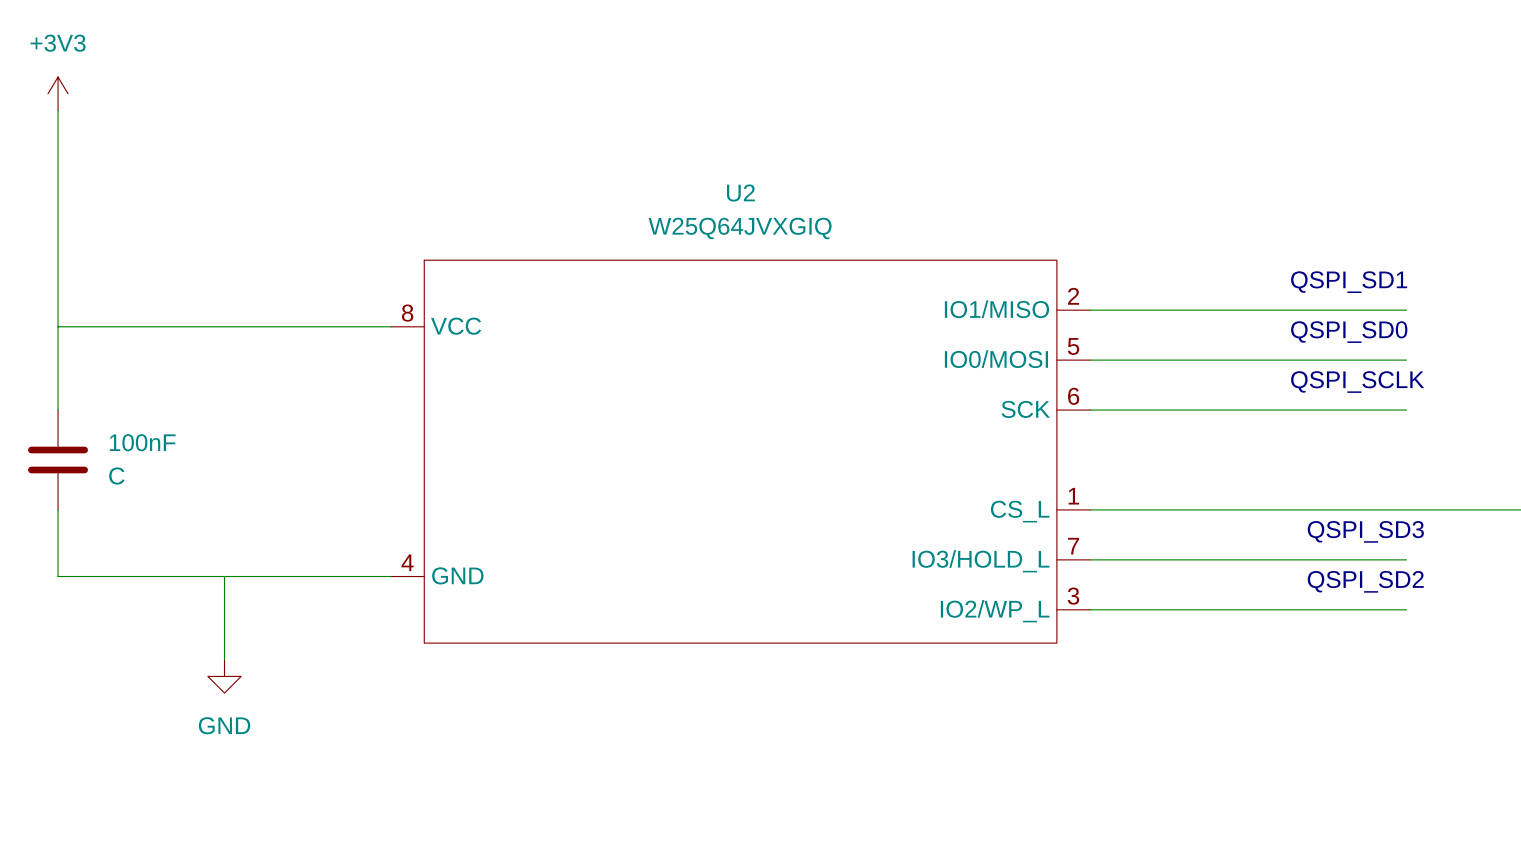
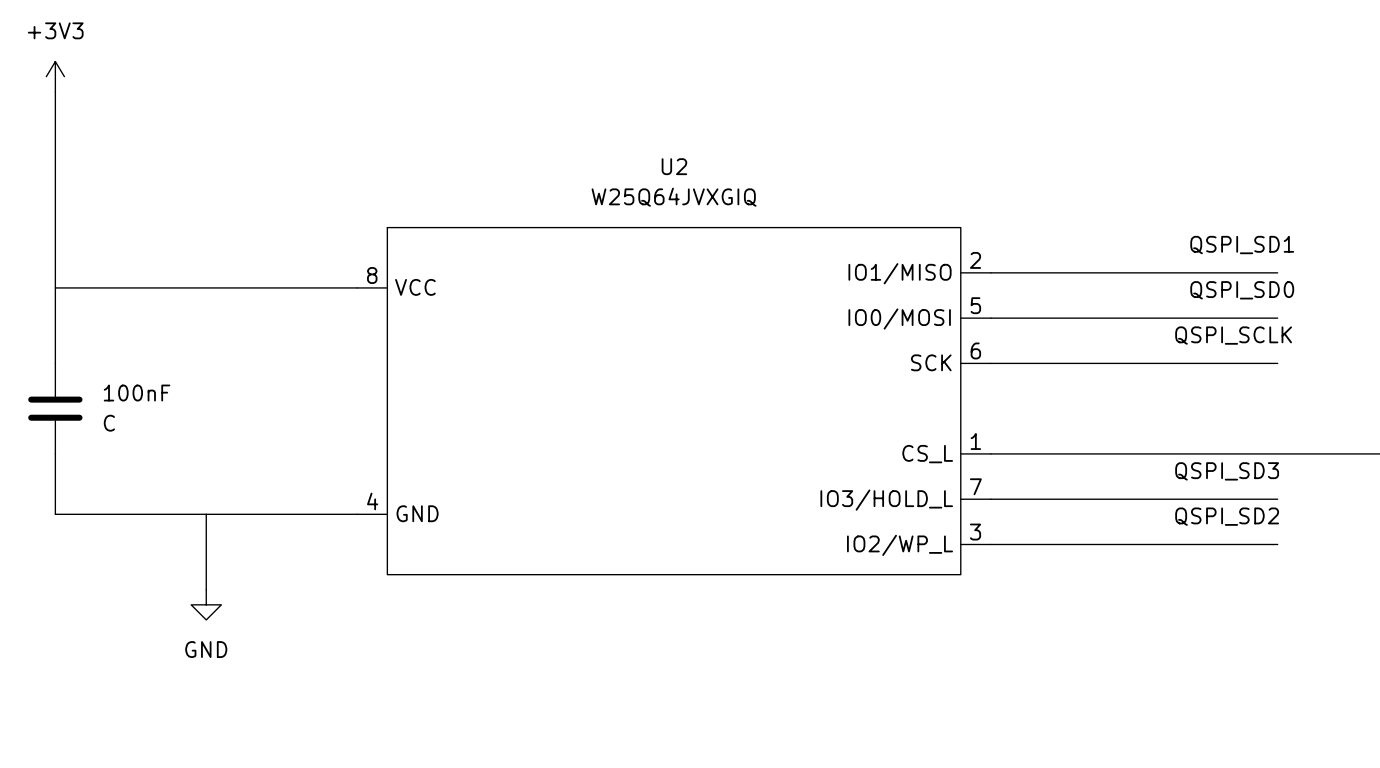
label: none -> QSPI_SD1 (1242, 245)
text: QSPI_SD1 (1349, 282) -> none
label: none -> QSPI_SD0 (1242, 290)
text: QSPI_SD0 (1349, 332) -> none
label: none -> QSPI_SCLK (1233, 335)
text: QSPI_SCLK (1357, 382) -> none
label: none -> QSPI_SD3 (1227, 471)
text: QSPI_SD3 (1365, 531) -> none
label: none -> QSPI_SD2 (1227, 516)
text: QSPI_SD2 (1365, 581) -> none

